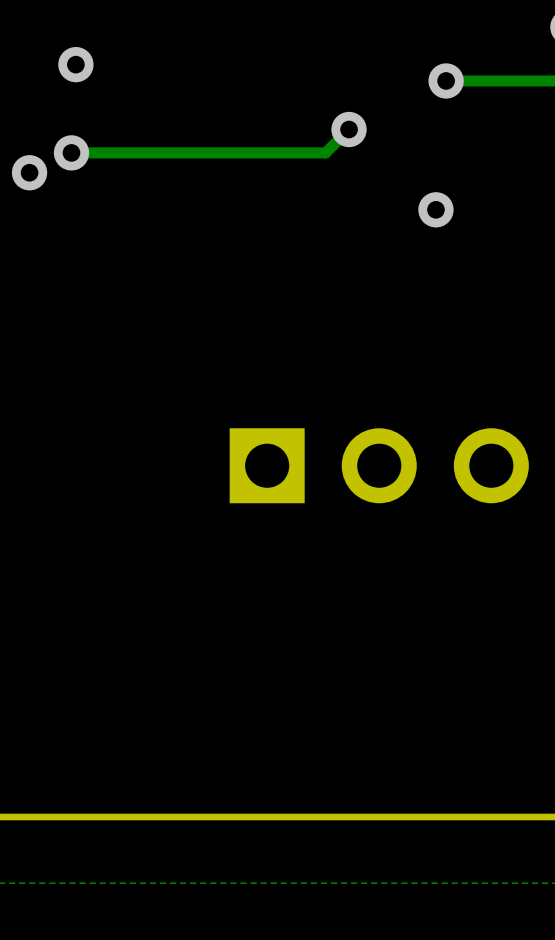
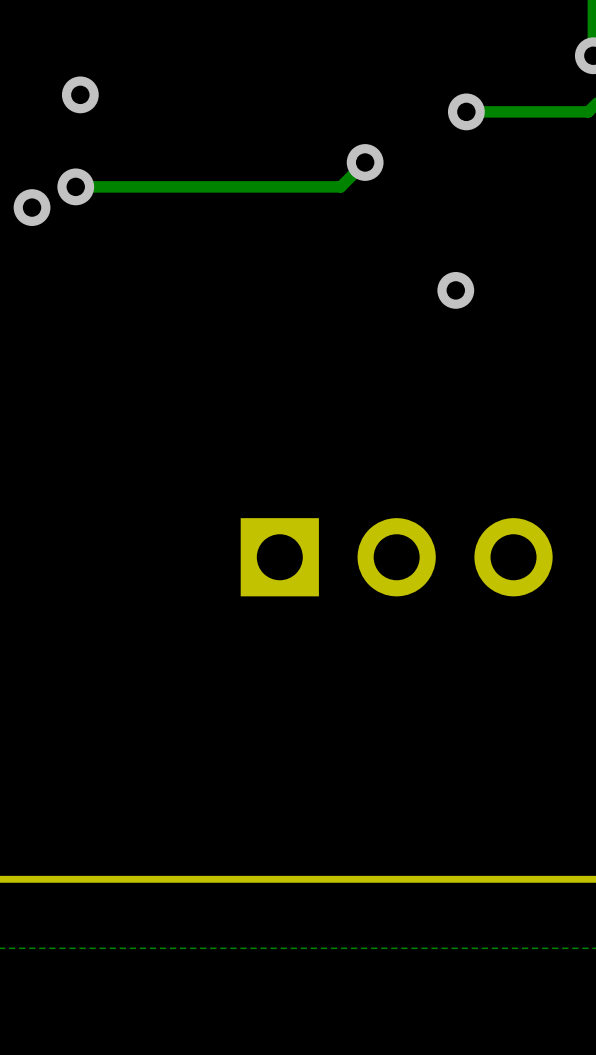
via position: (435, 209) -> (455, 290)
part position: (379, 465) -> (396, 557)

